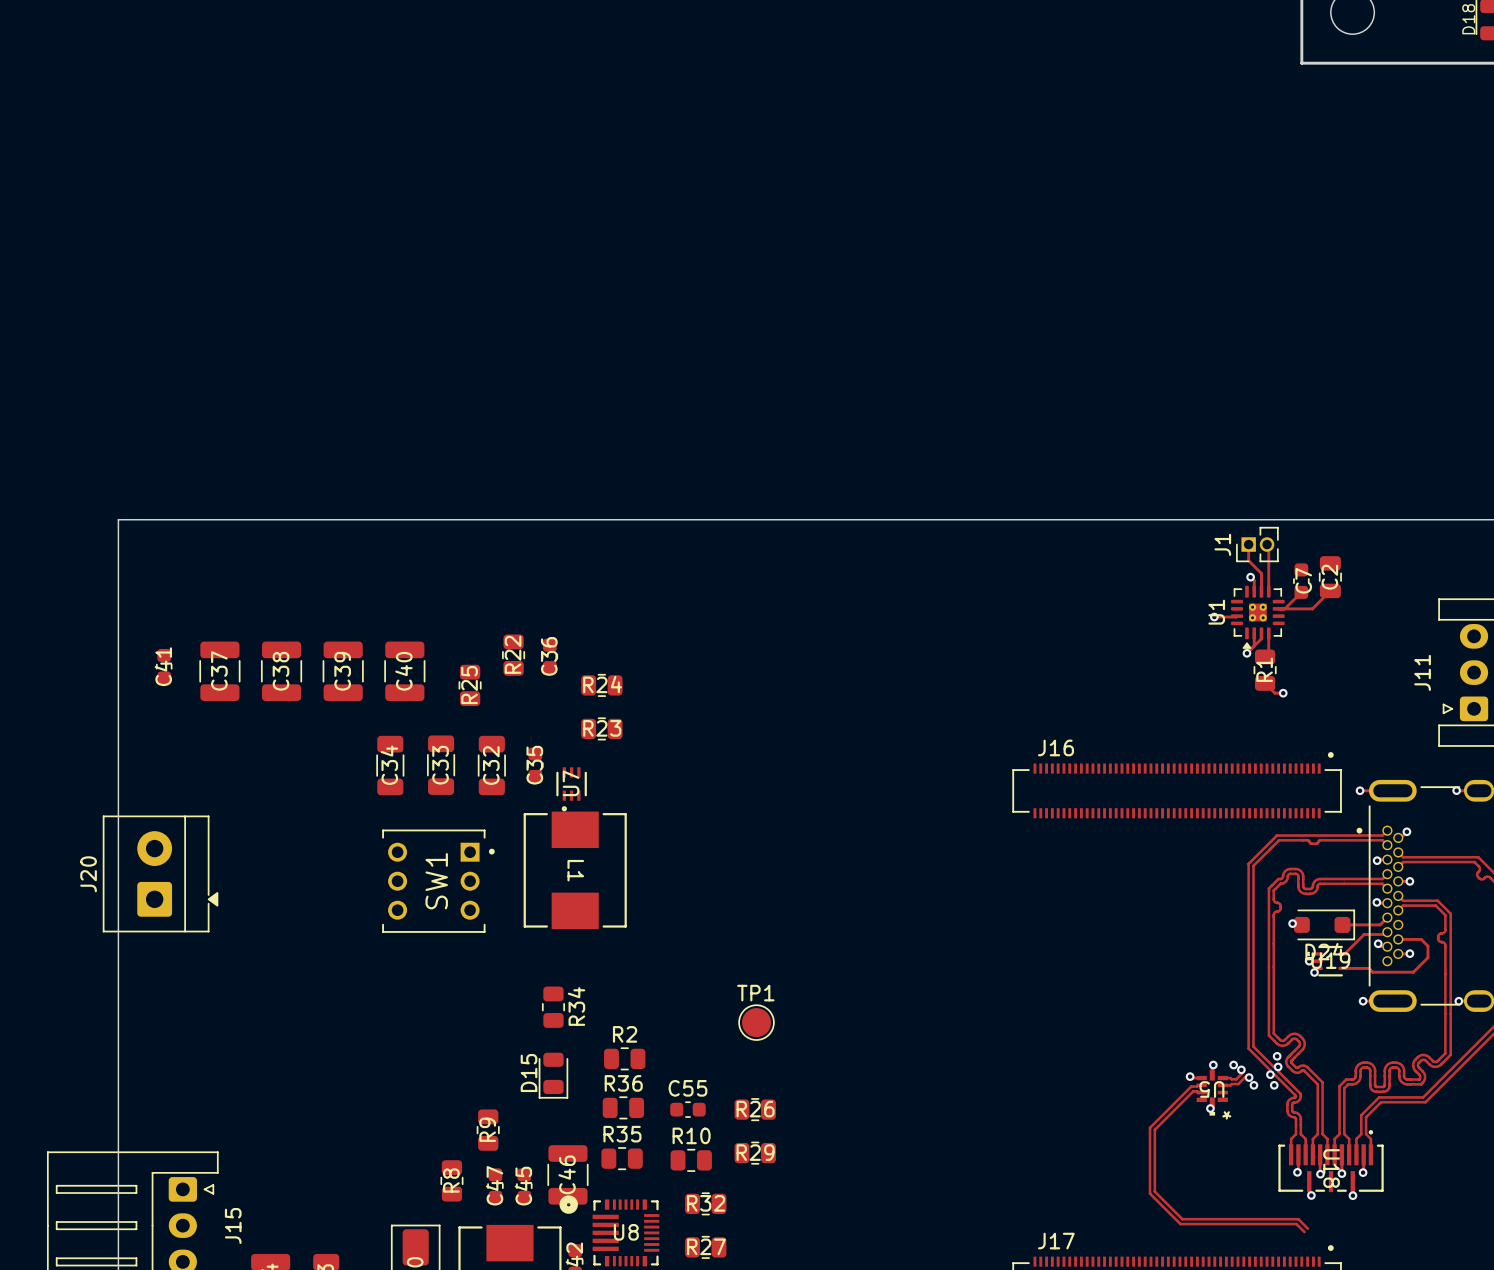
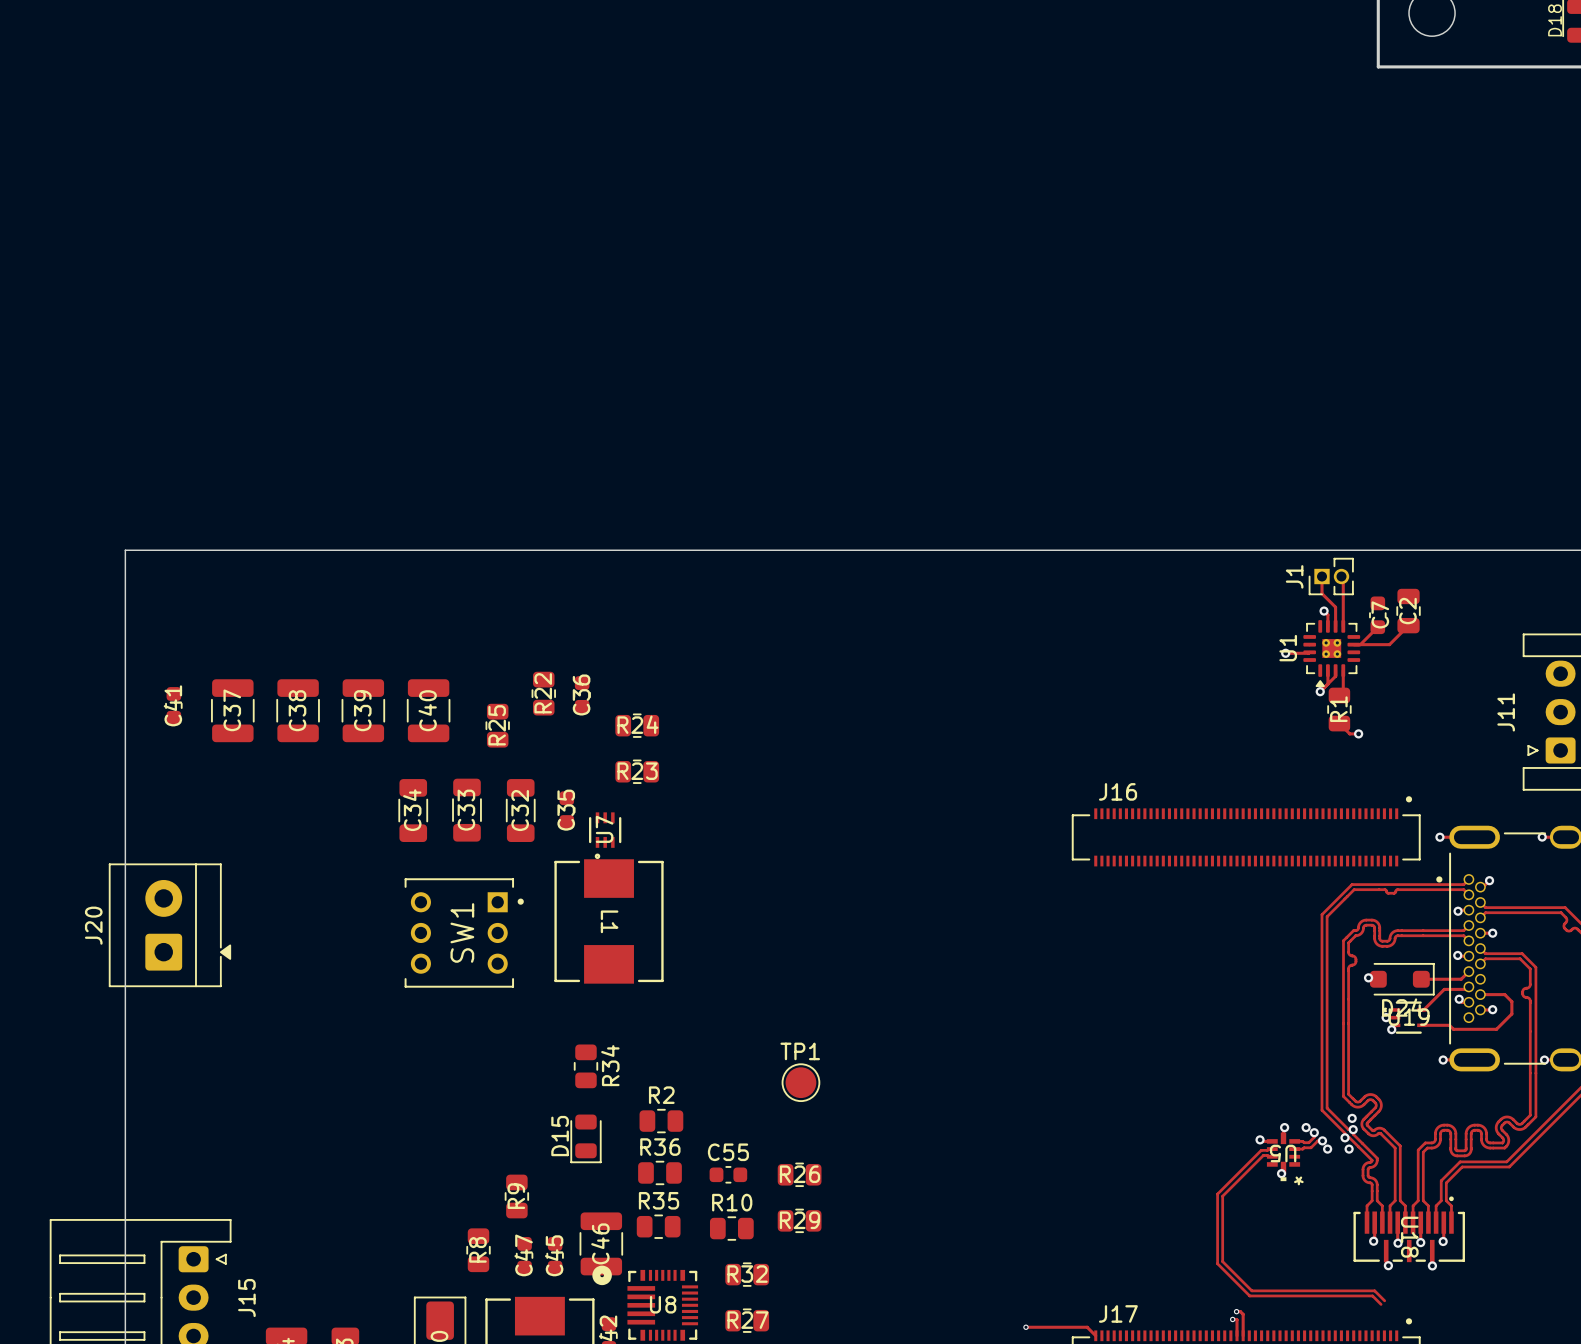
track: none -> (1236, 1311) (1243, 1314) (1243, 1335)
via: none -> (1236, 1311)
track: none -> (1232, 1319) (1237, 1319) (1237, 1335)
via: none -> (1232, 1319)
track: none -> (1025, 1327) (1087, 1327) (1095, 1335)
via: none -> (1025, 1327)

